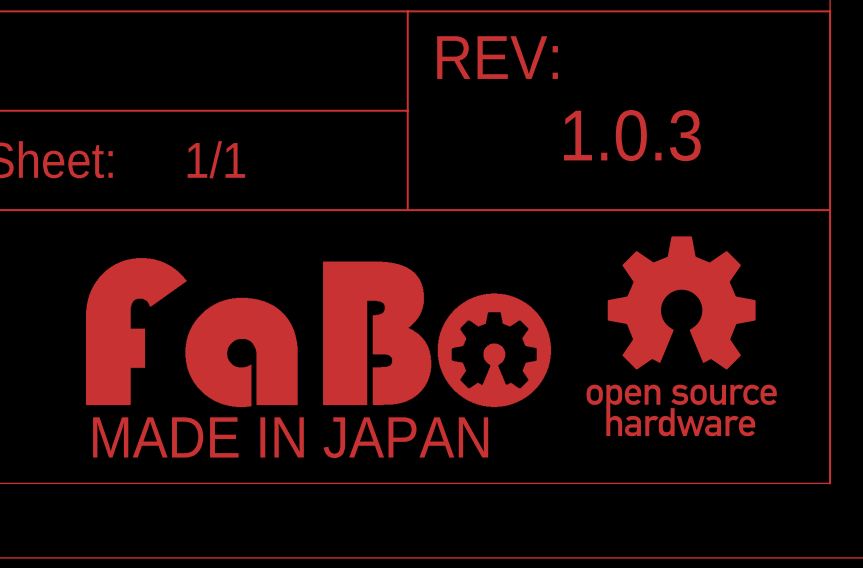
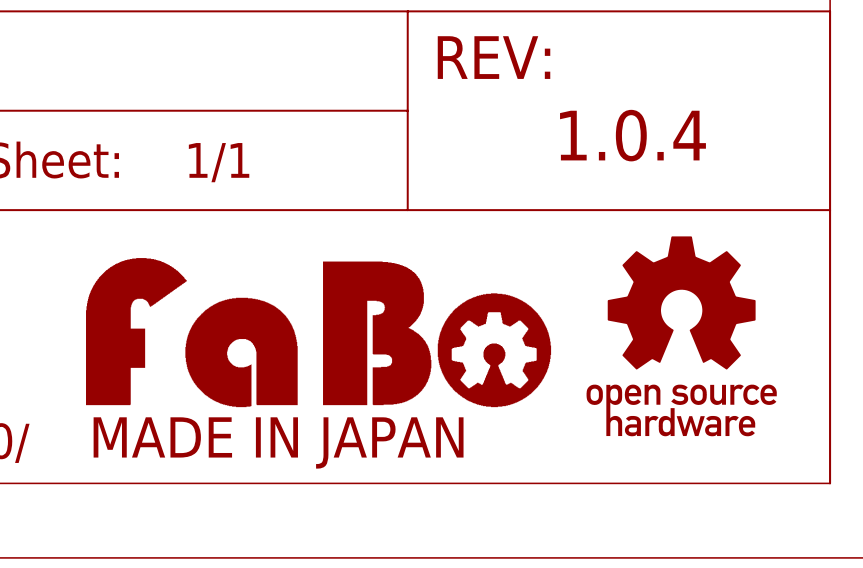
text: 1.0.3 (632, 135) -> 1.0.4 (632, 135)

